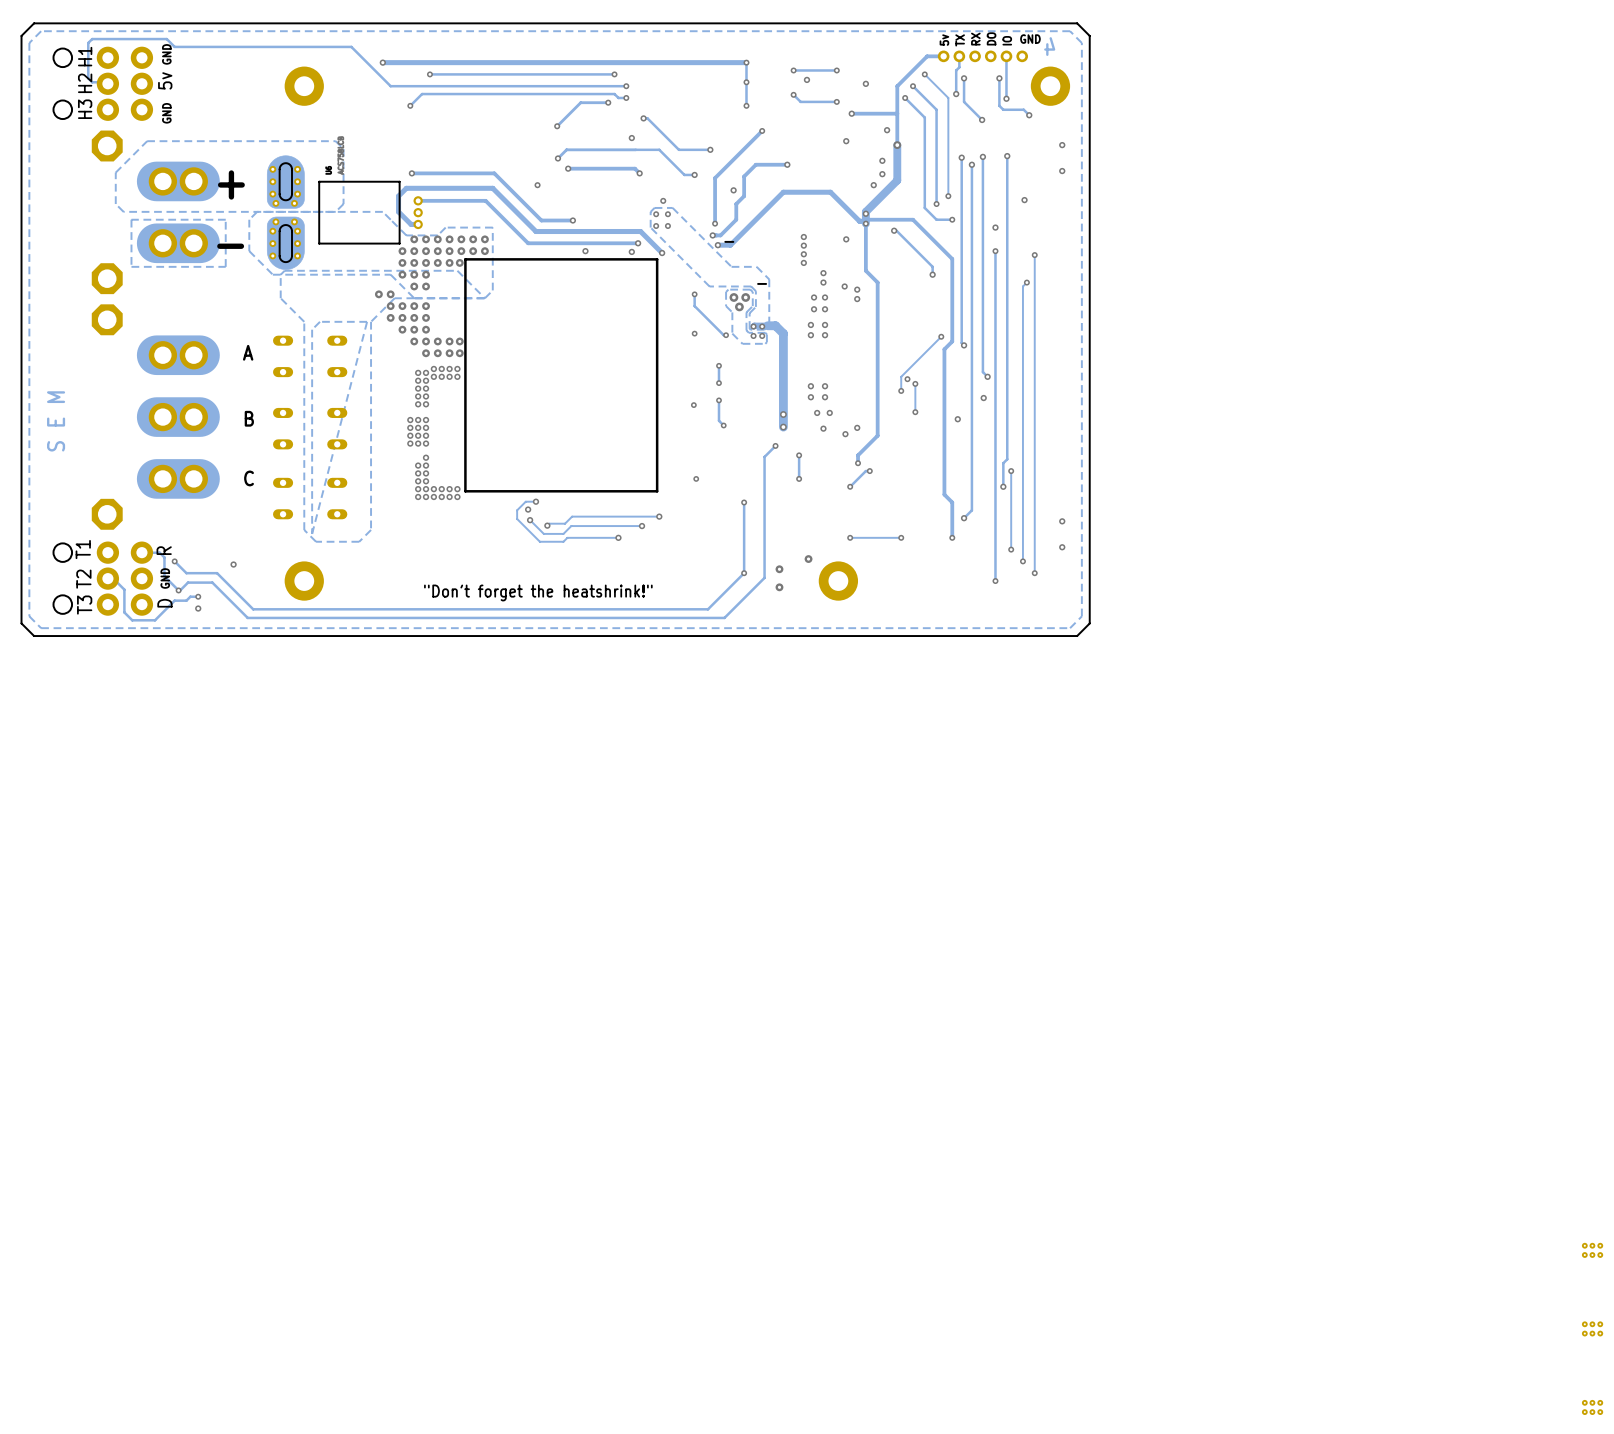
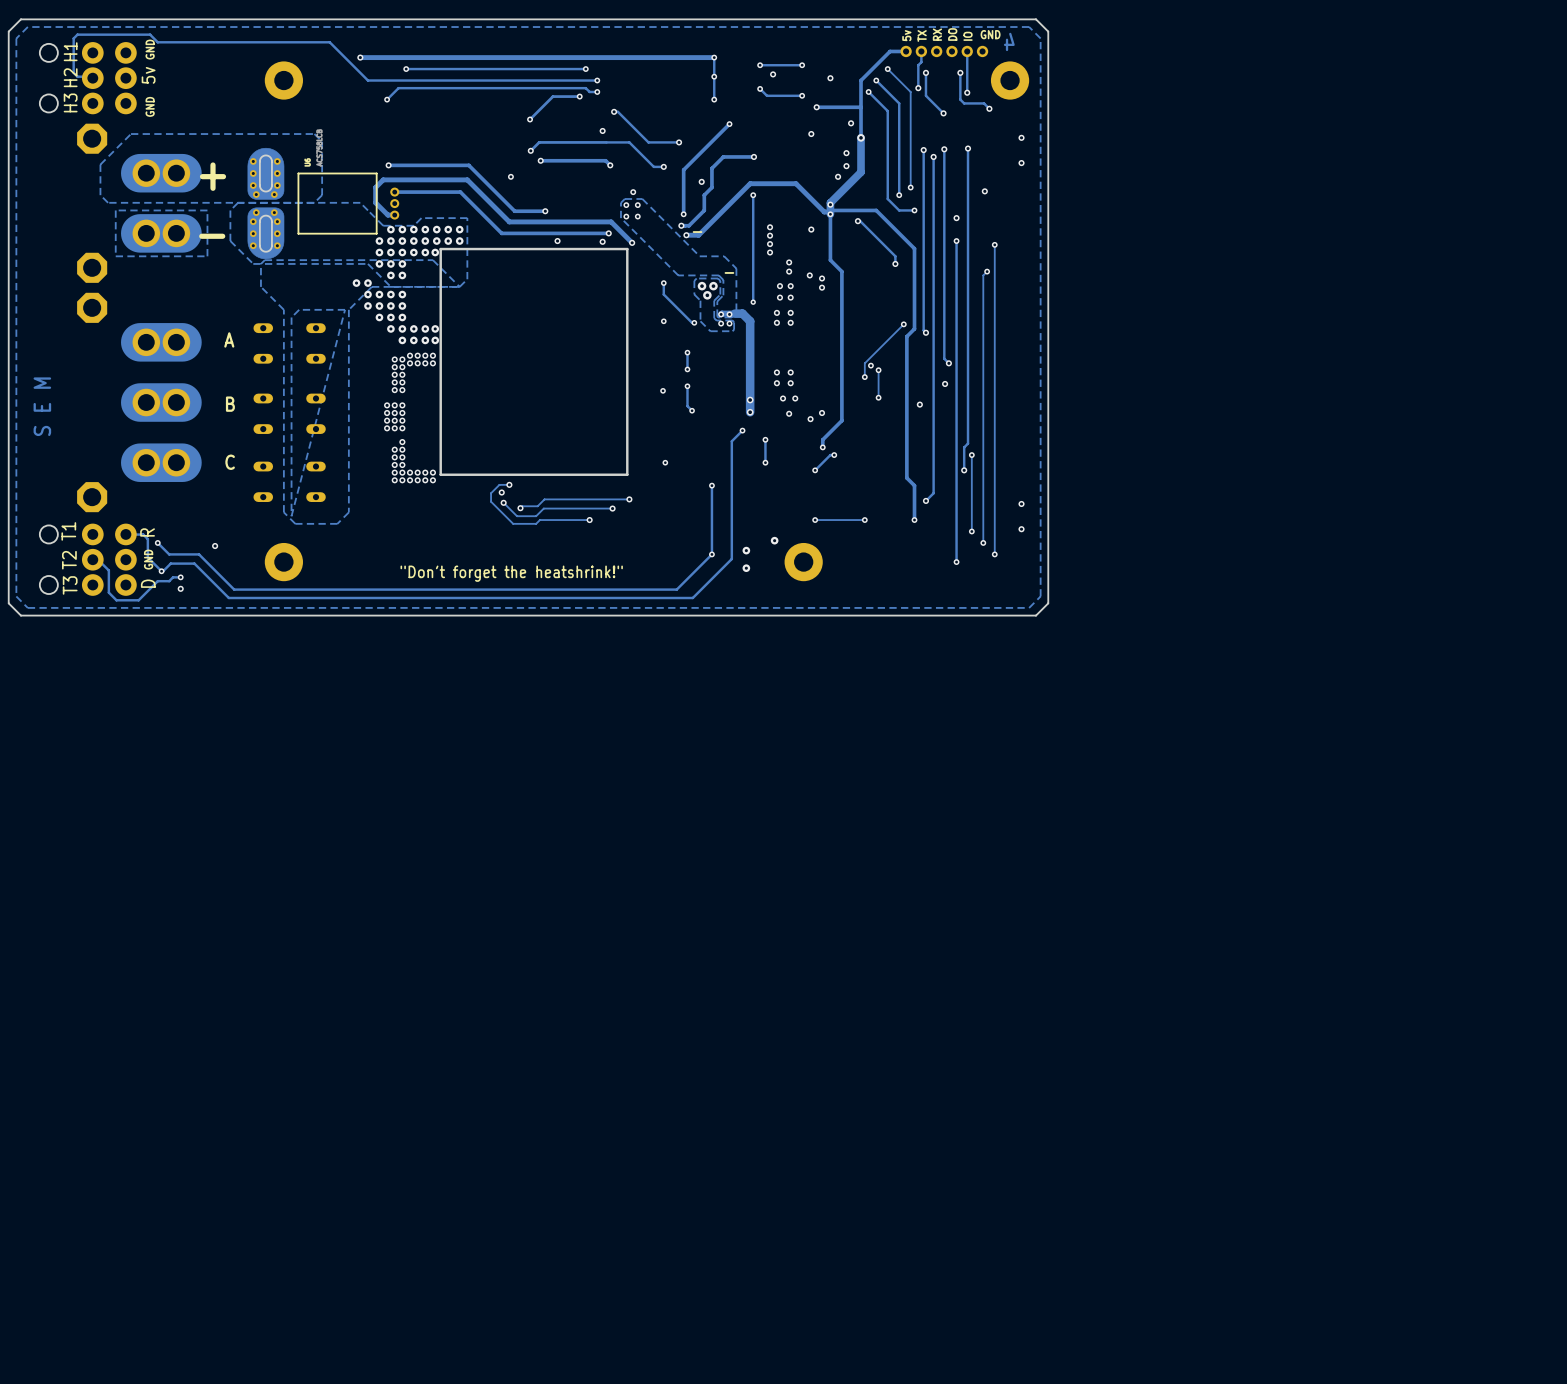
track: none -> (753, 195) (753, 302)
via: none -> (753, 195)
via: none -> (753, 302)
part: (1592, 1250) -> none
part: (1592, 1328) -> none
part: (1592, 1407) -> none

